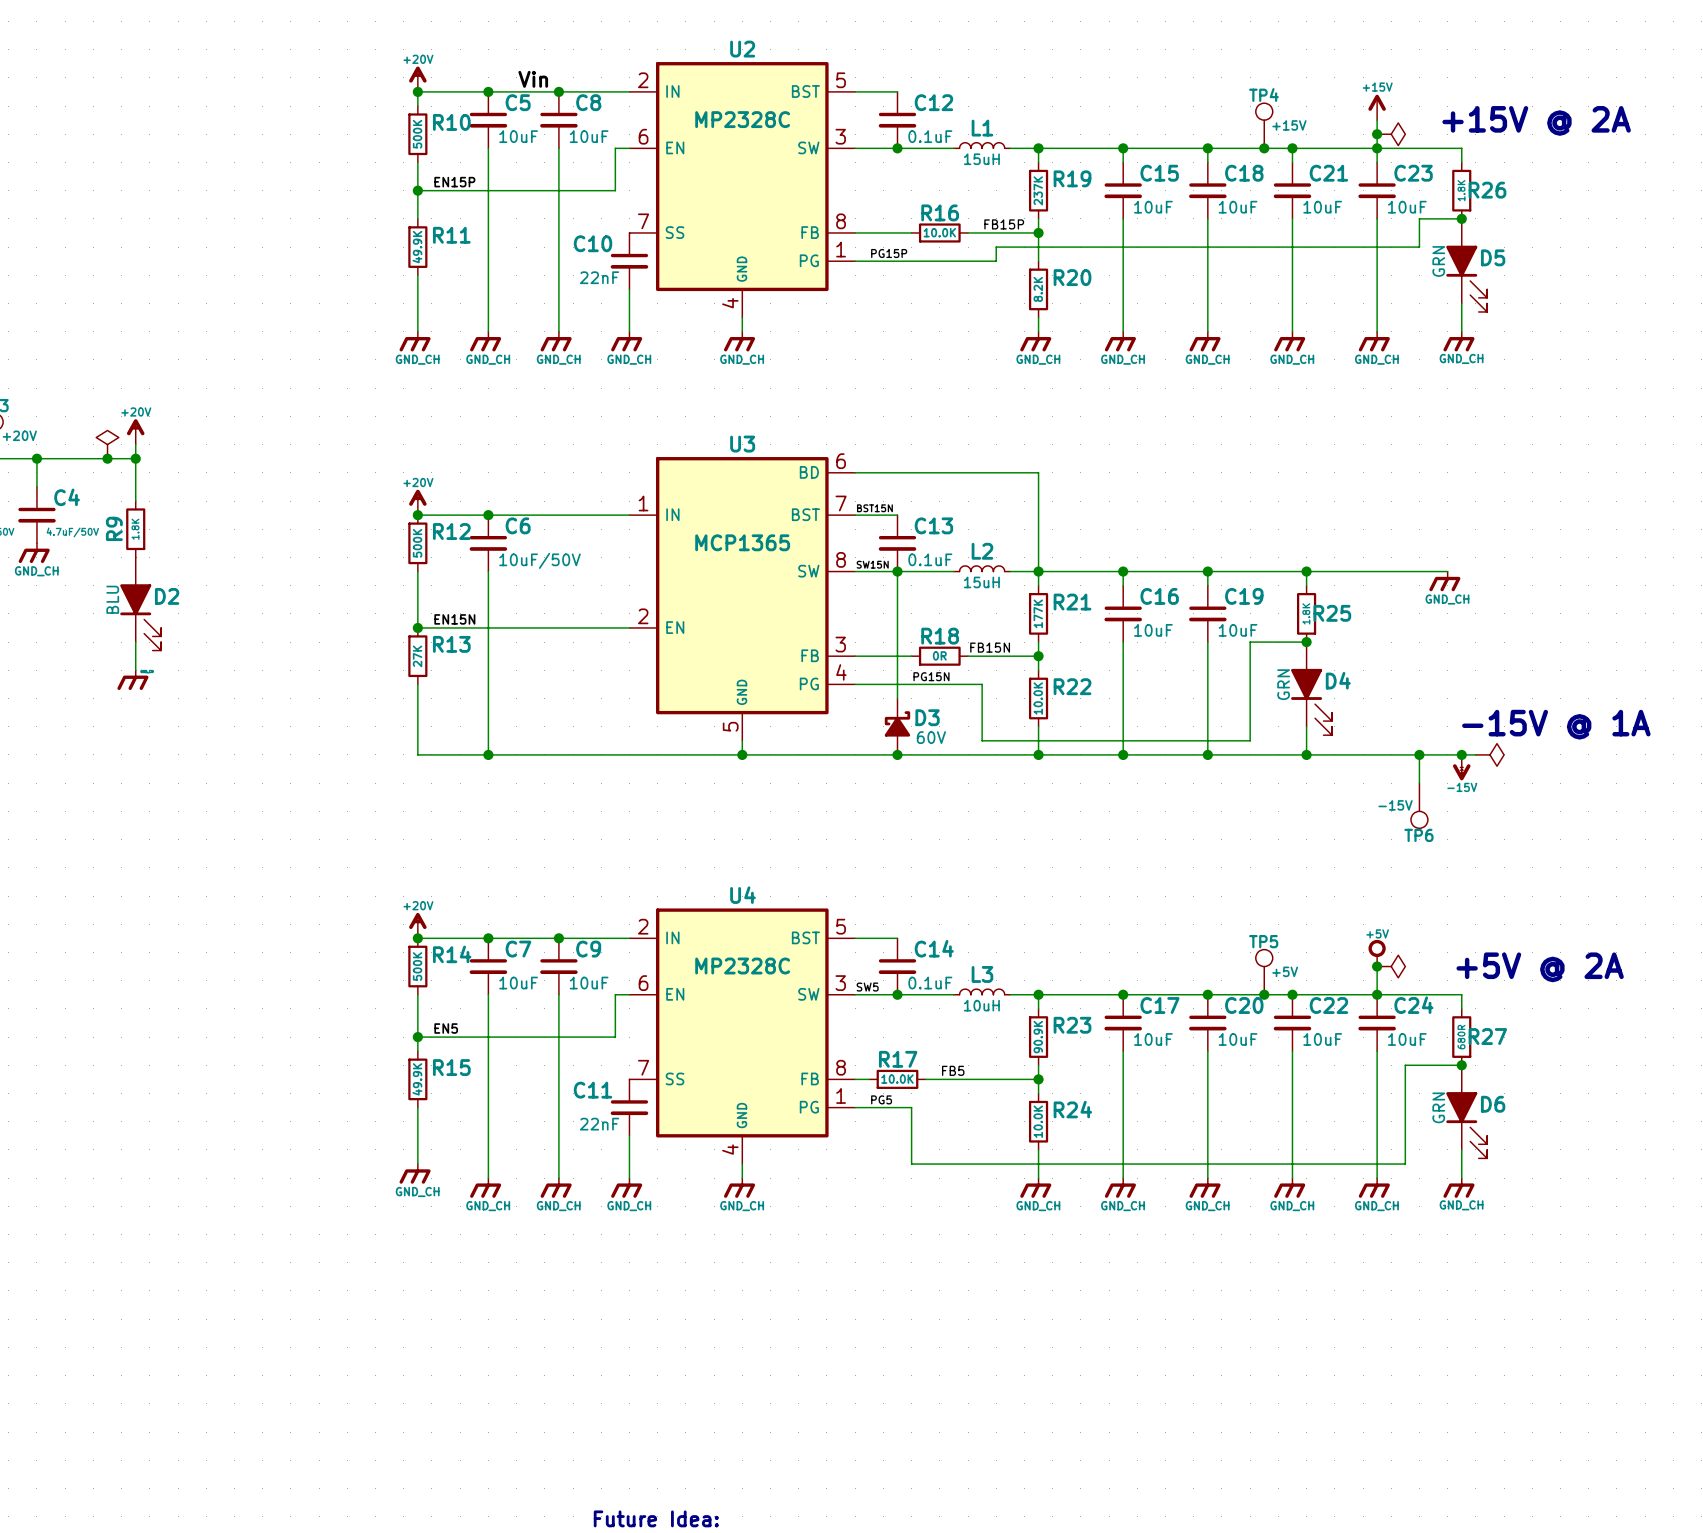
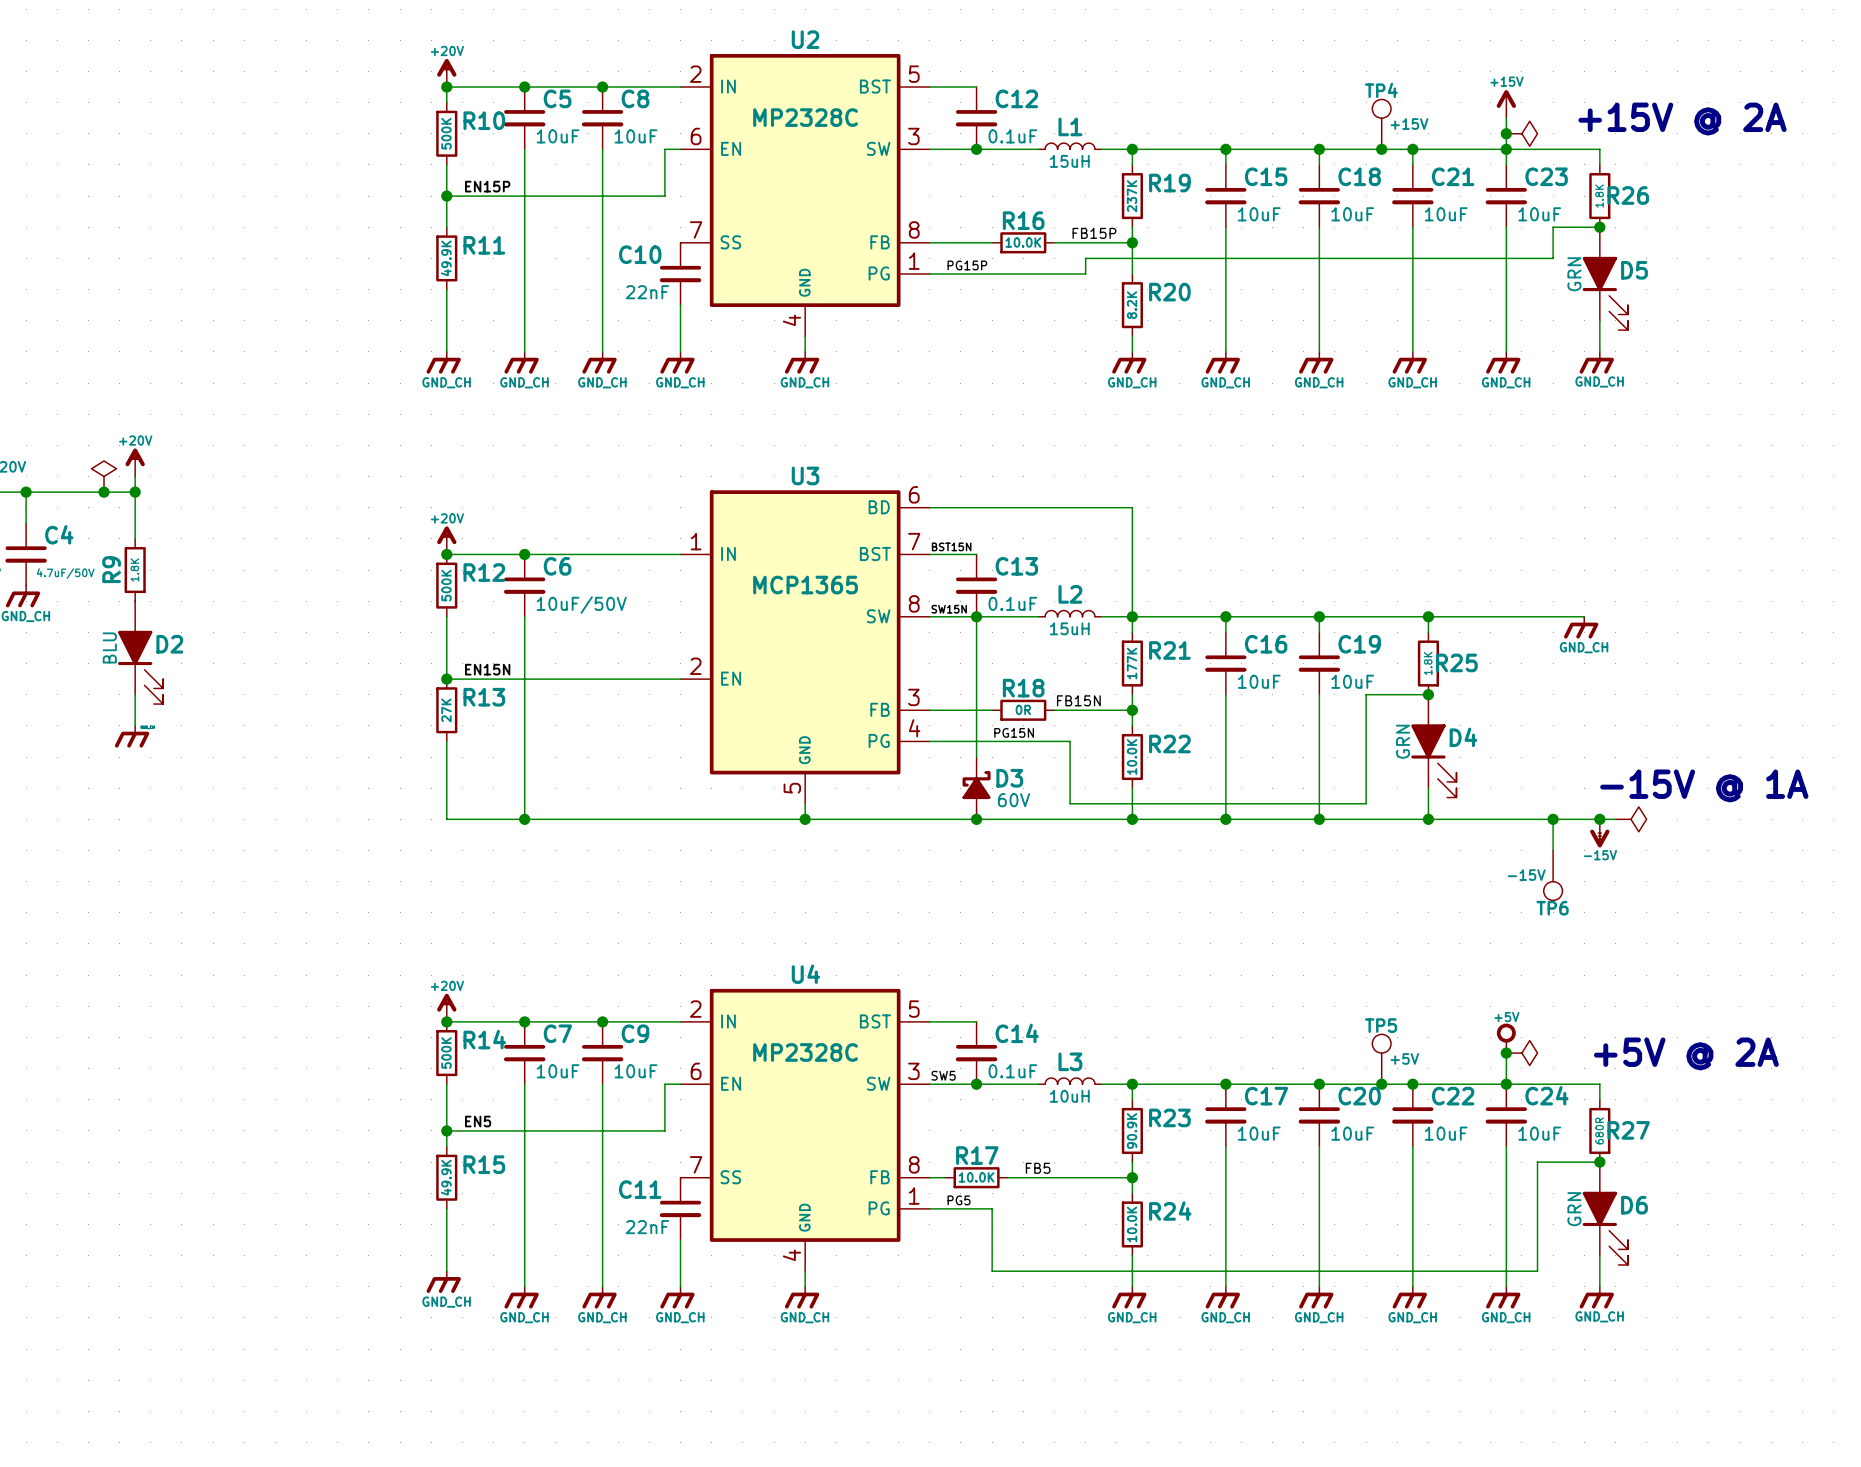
label: Vin (533, 79) -> none

